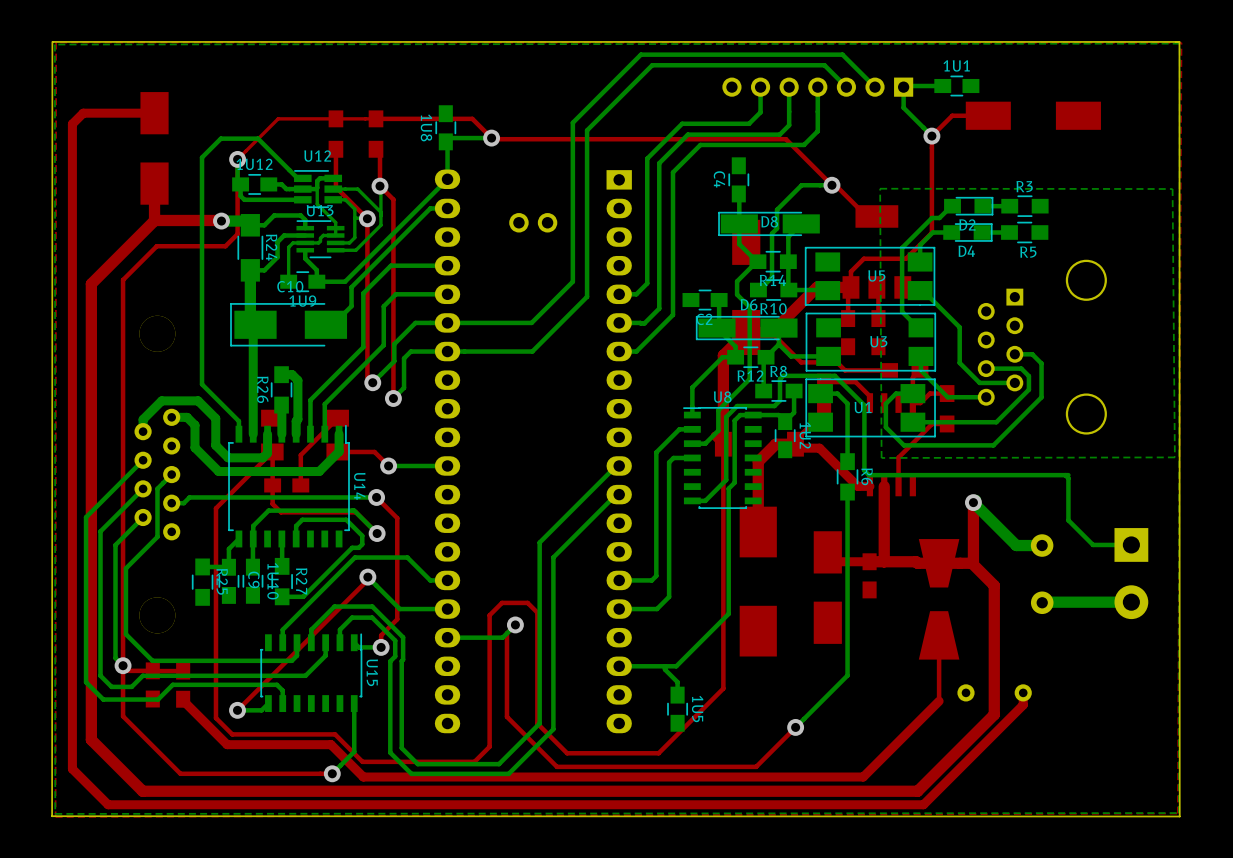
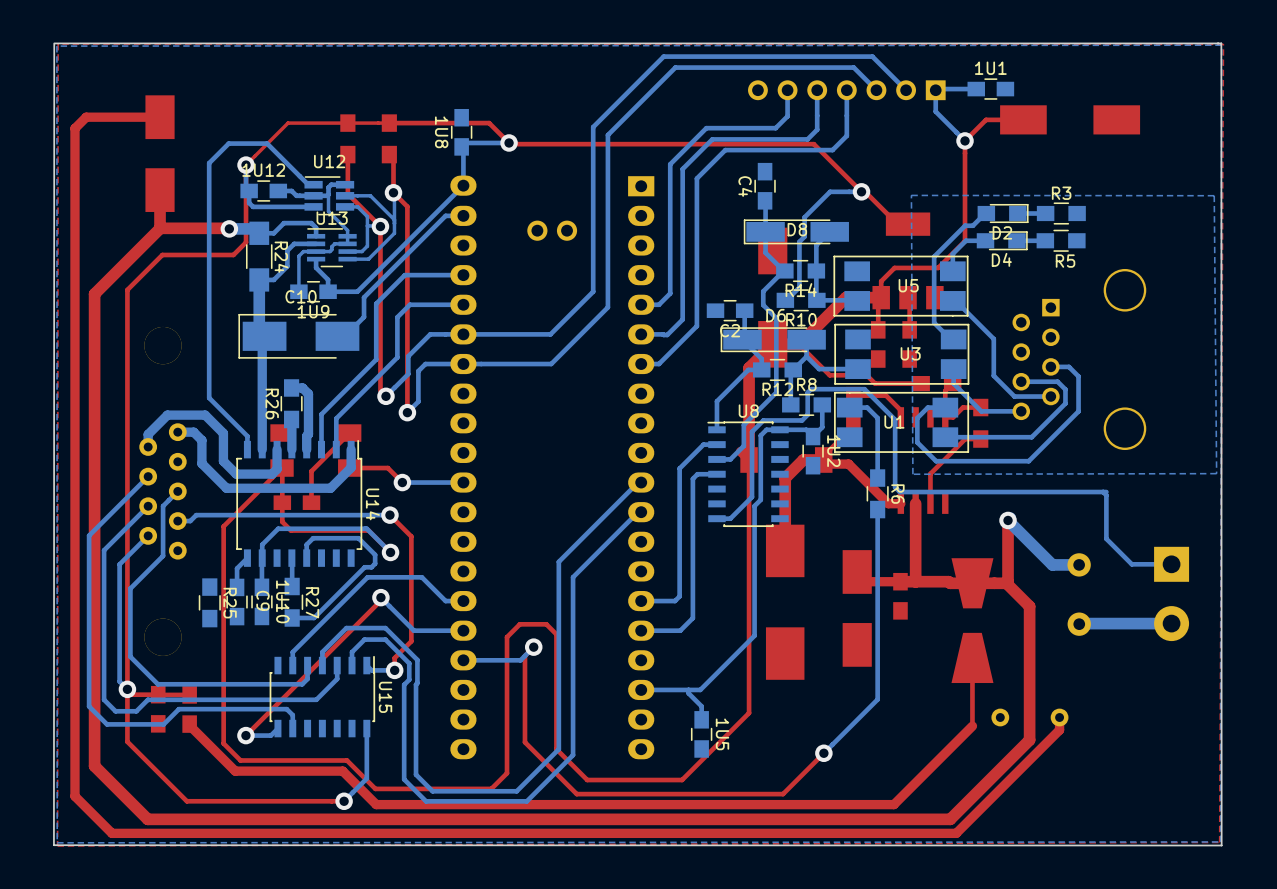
bottom track: (228, 566) (202, 566) -> none

